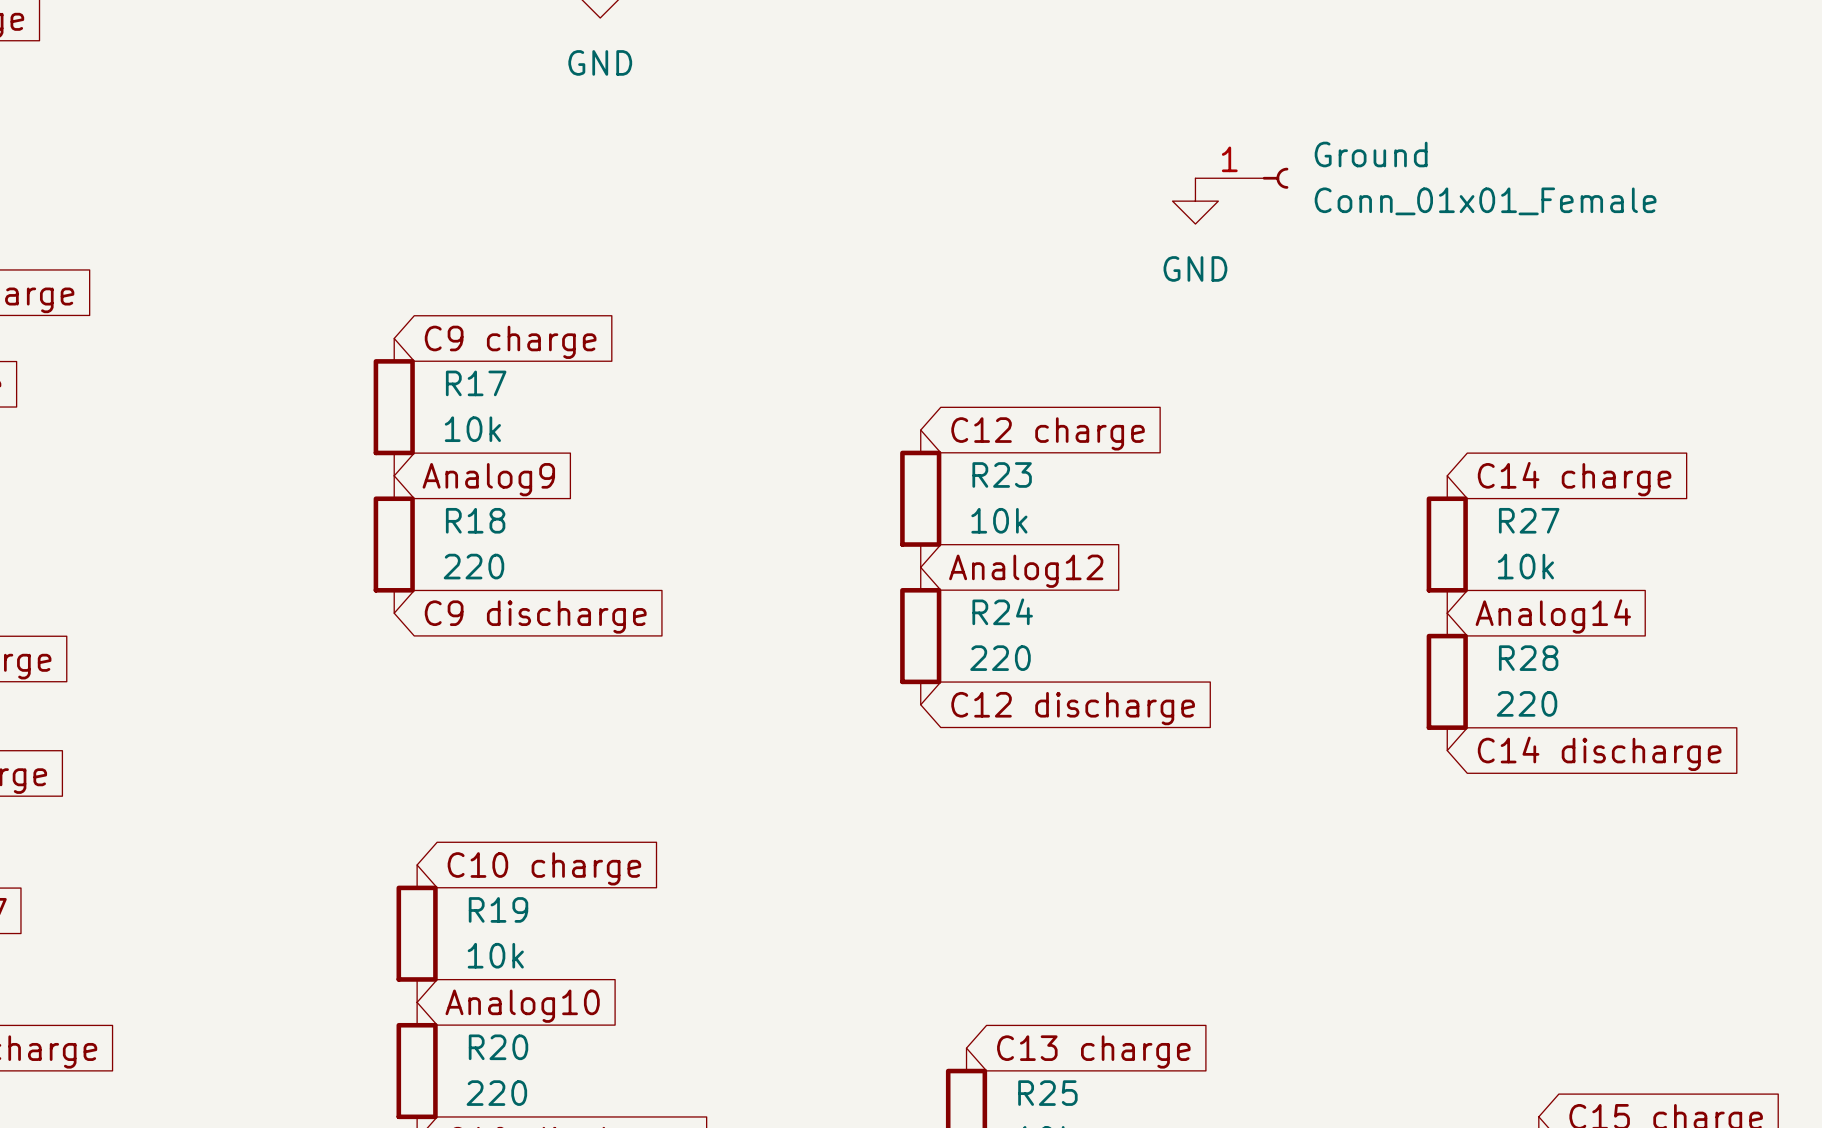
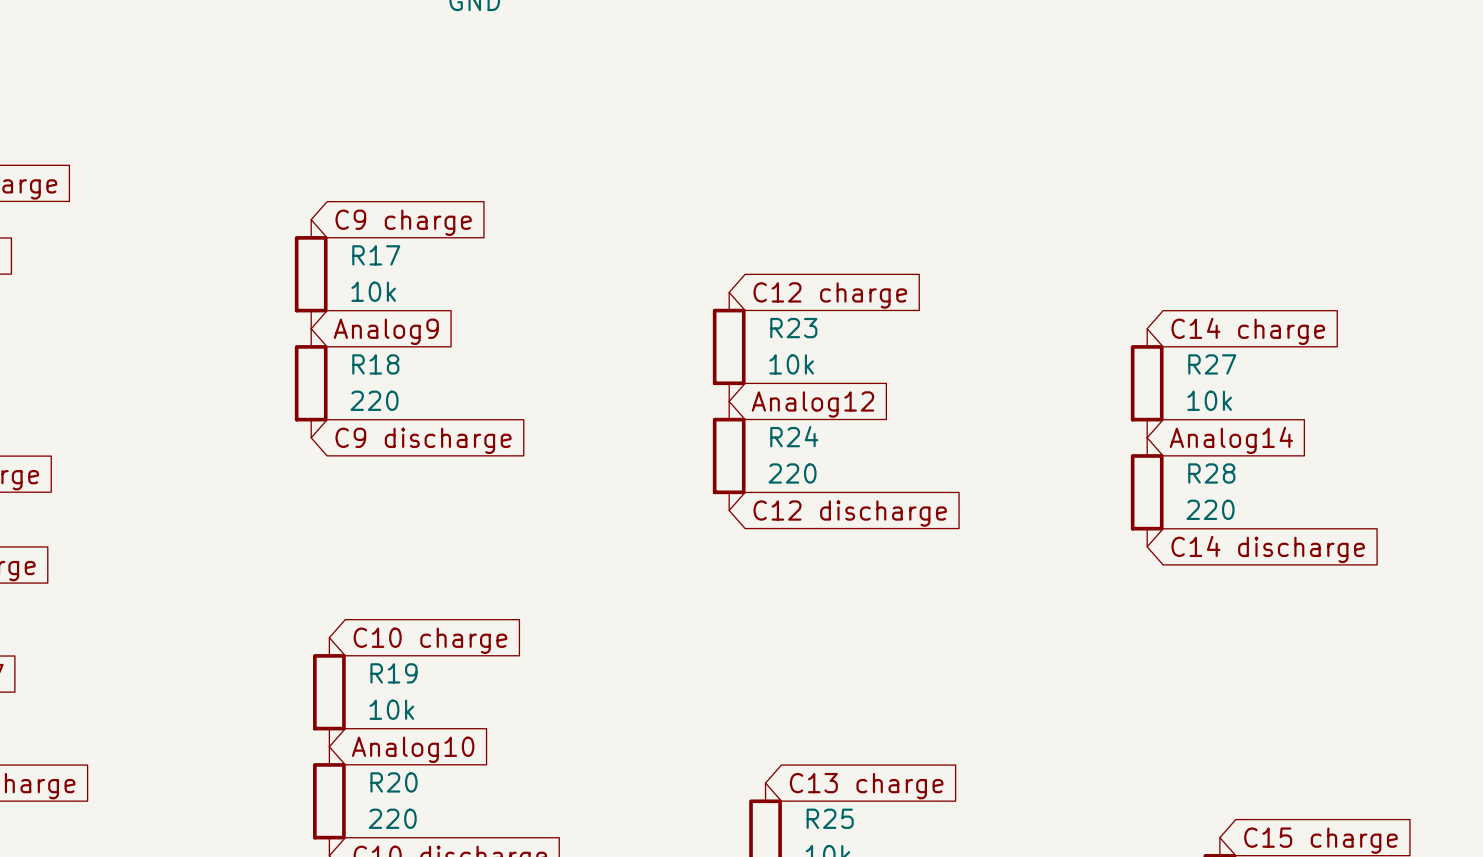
Ground: Conn_01x01_Female (1241, 178) -> none
power symbol: GND (1195, 201) -> none

